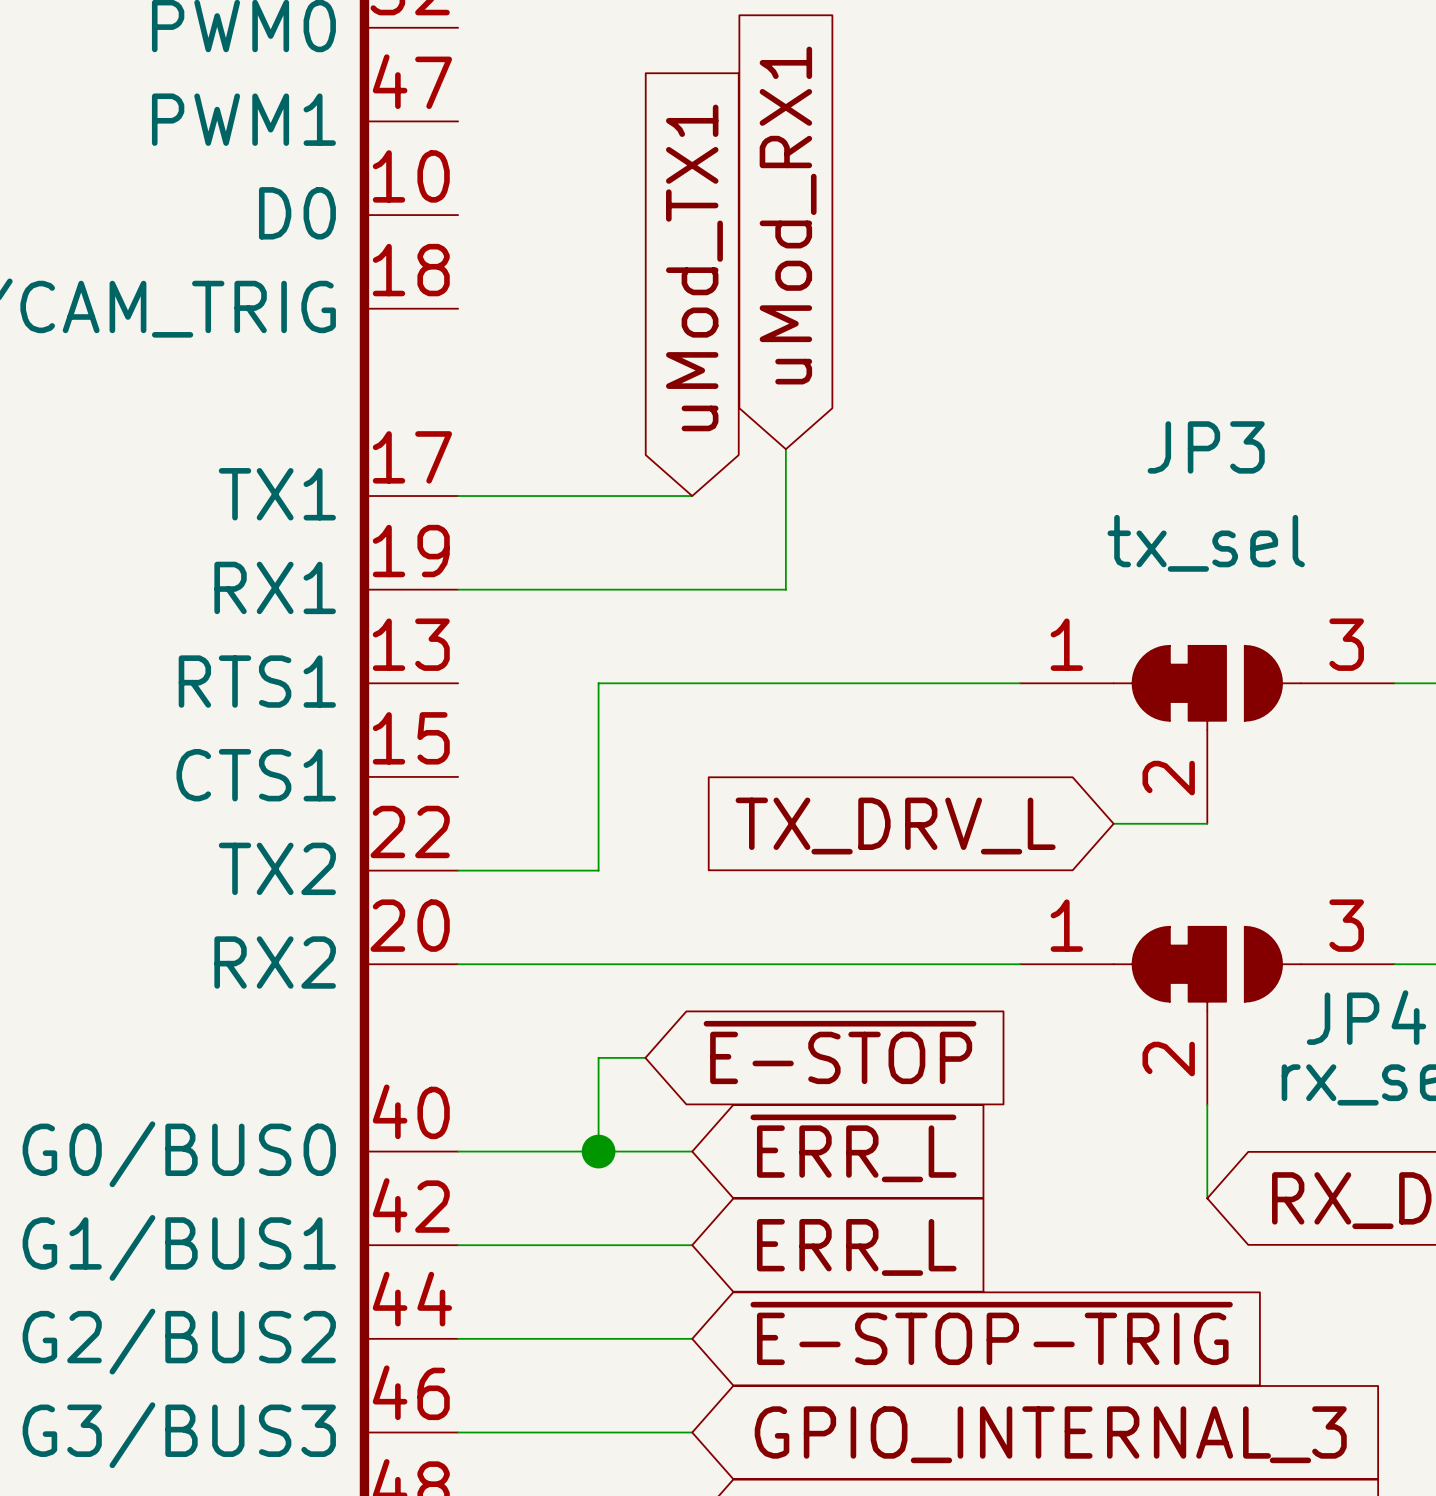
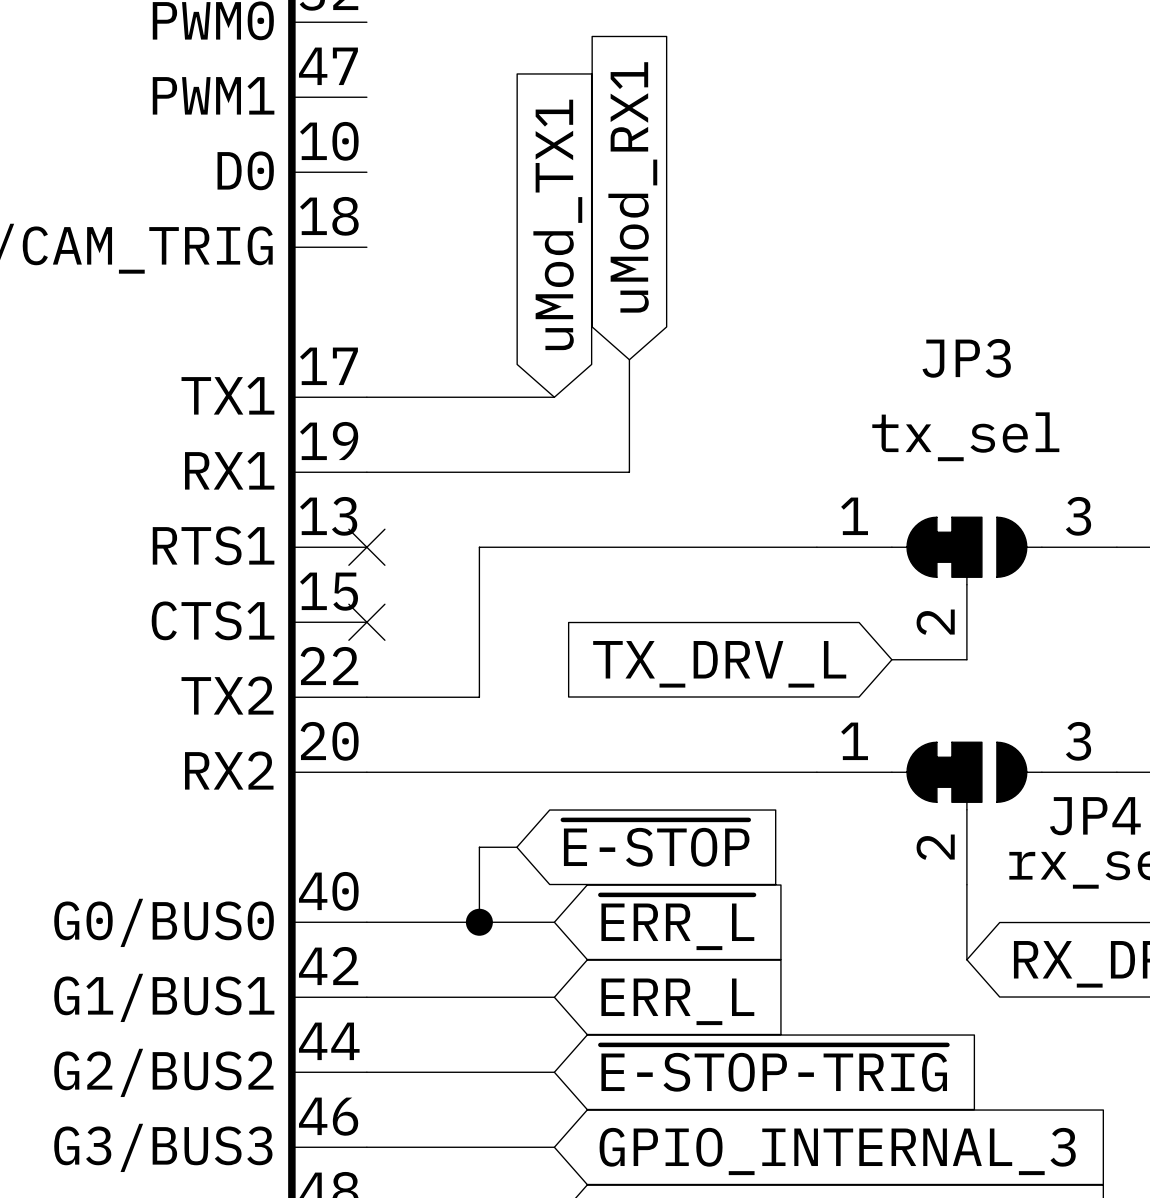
no-connect mark: none -> (366, 547)
no-connect mark: none -> (366, 622)

